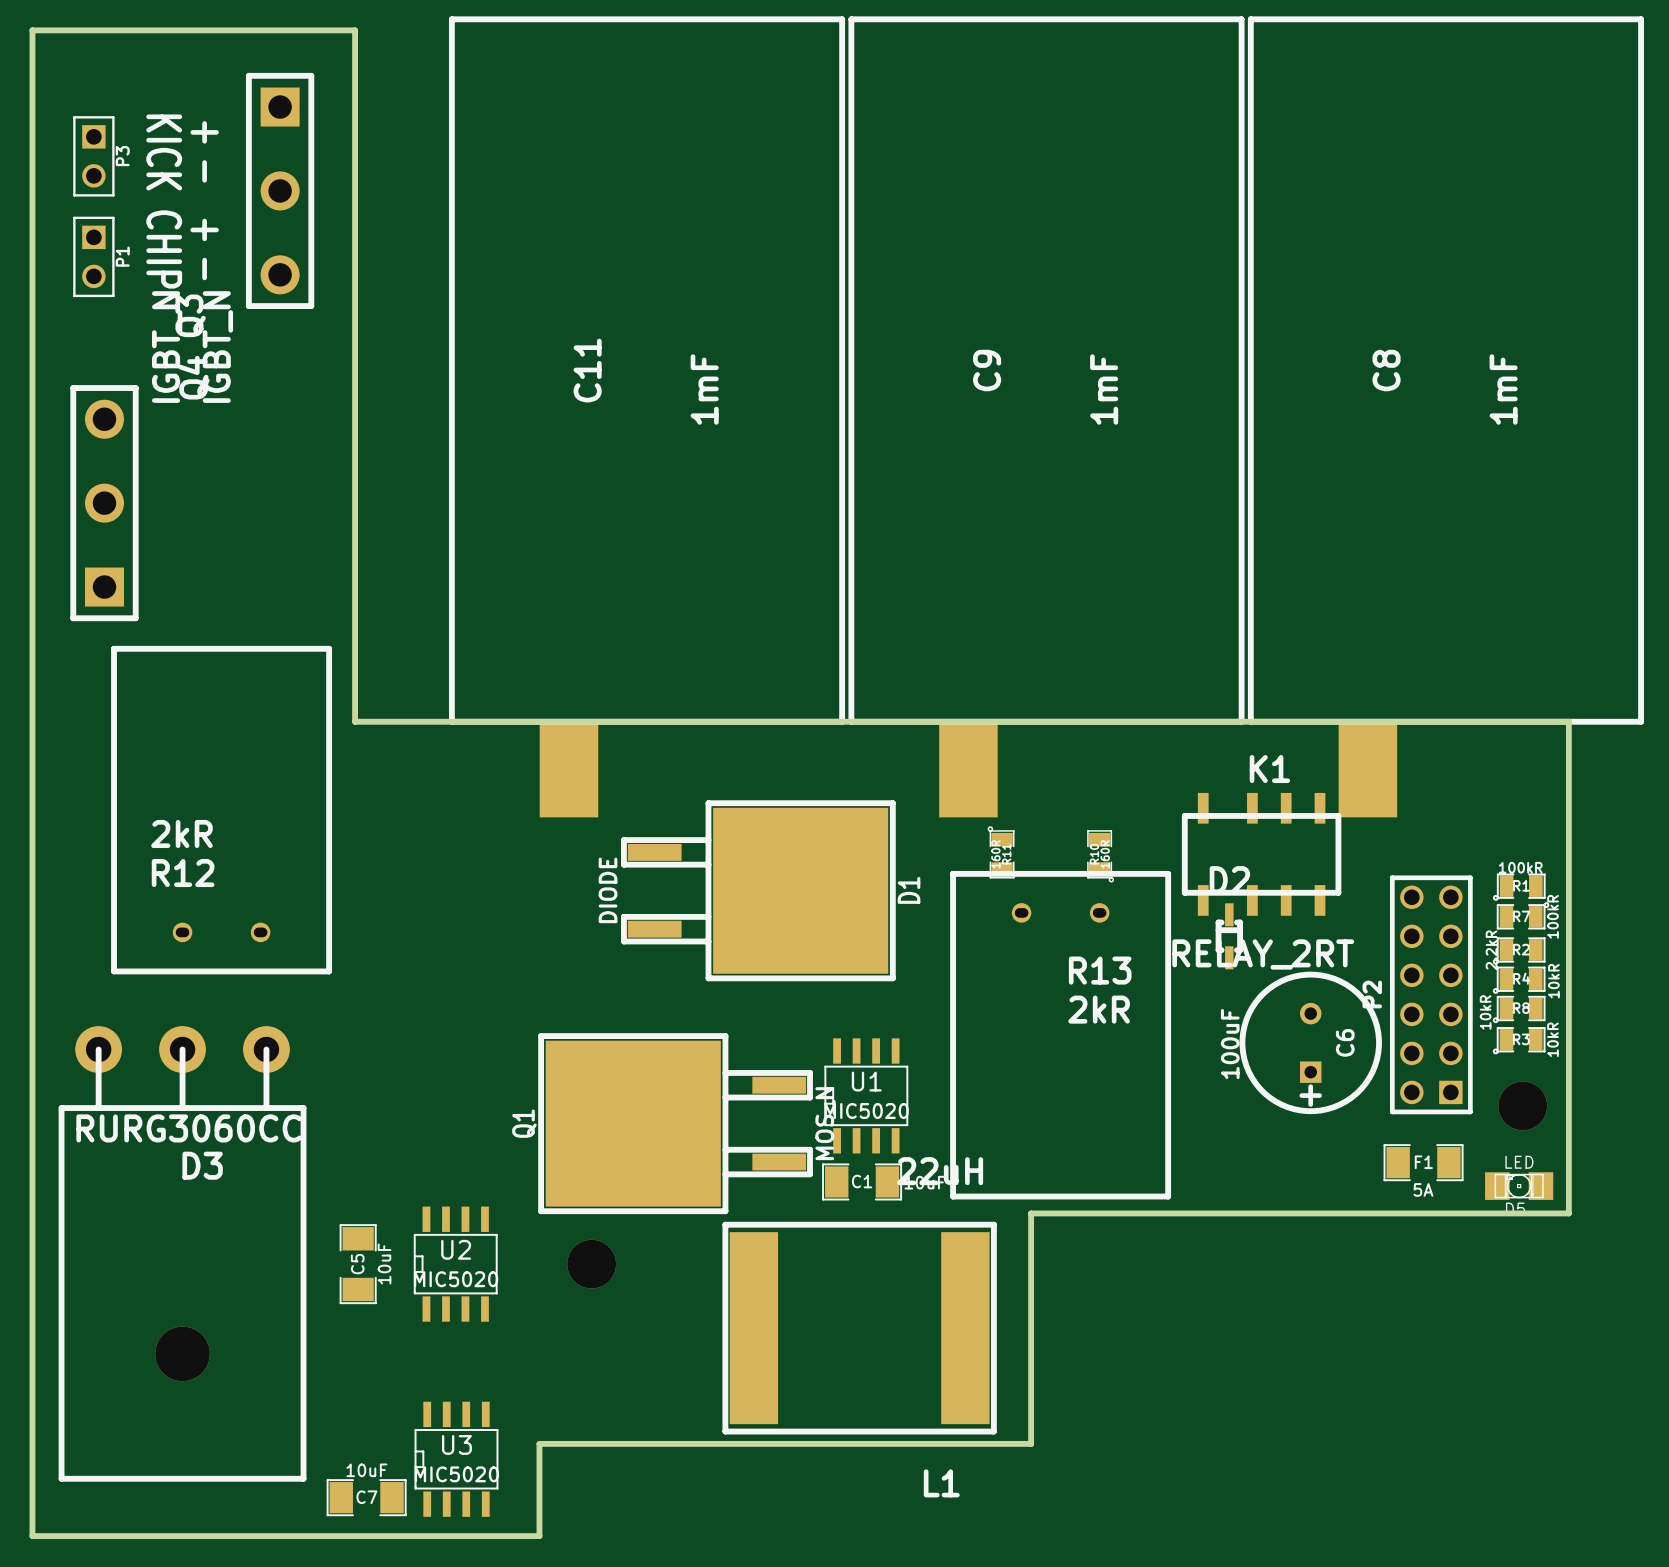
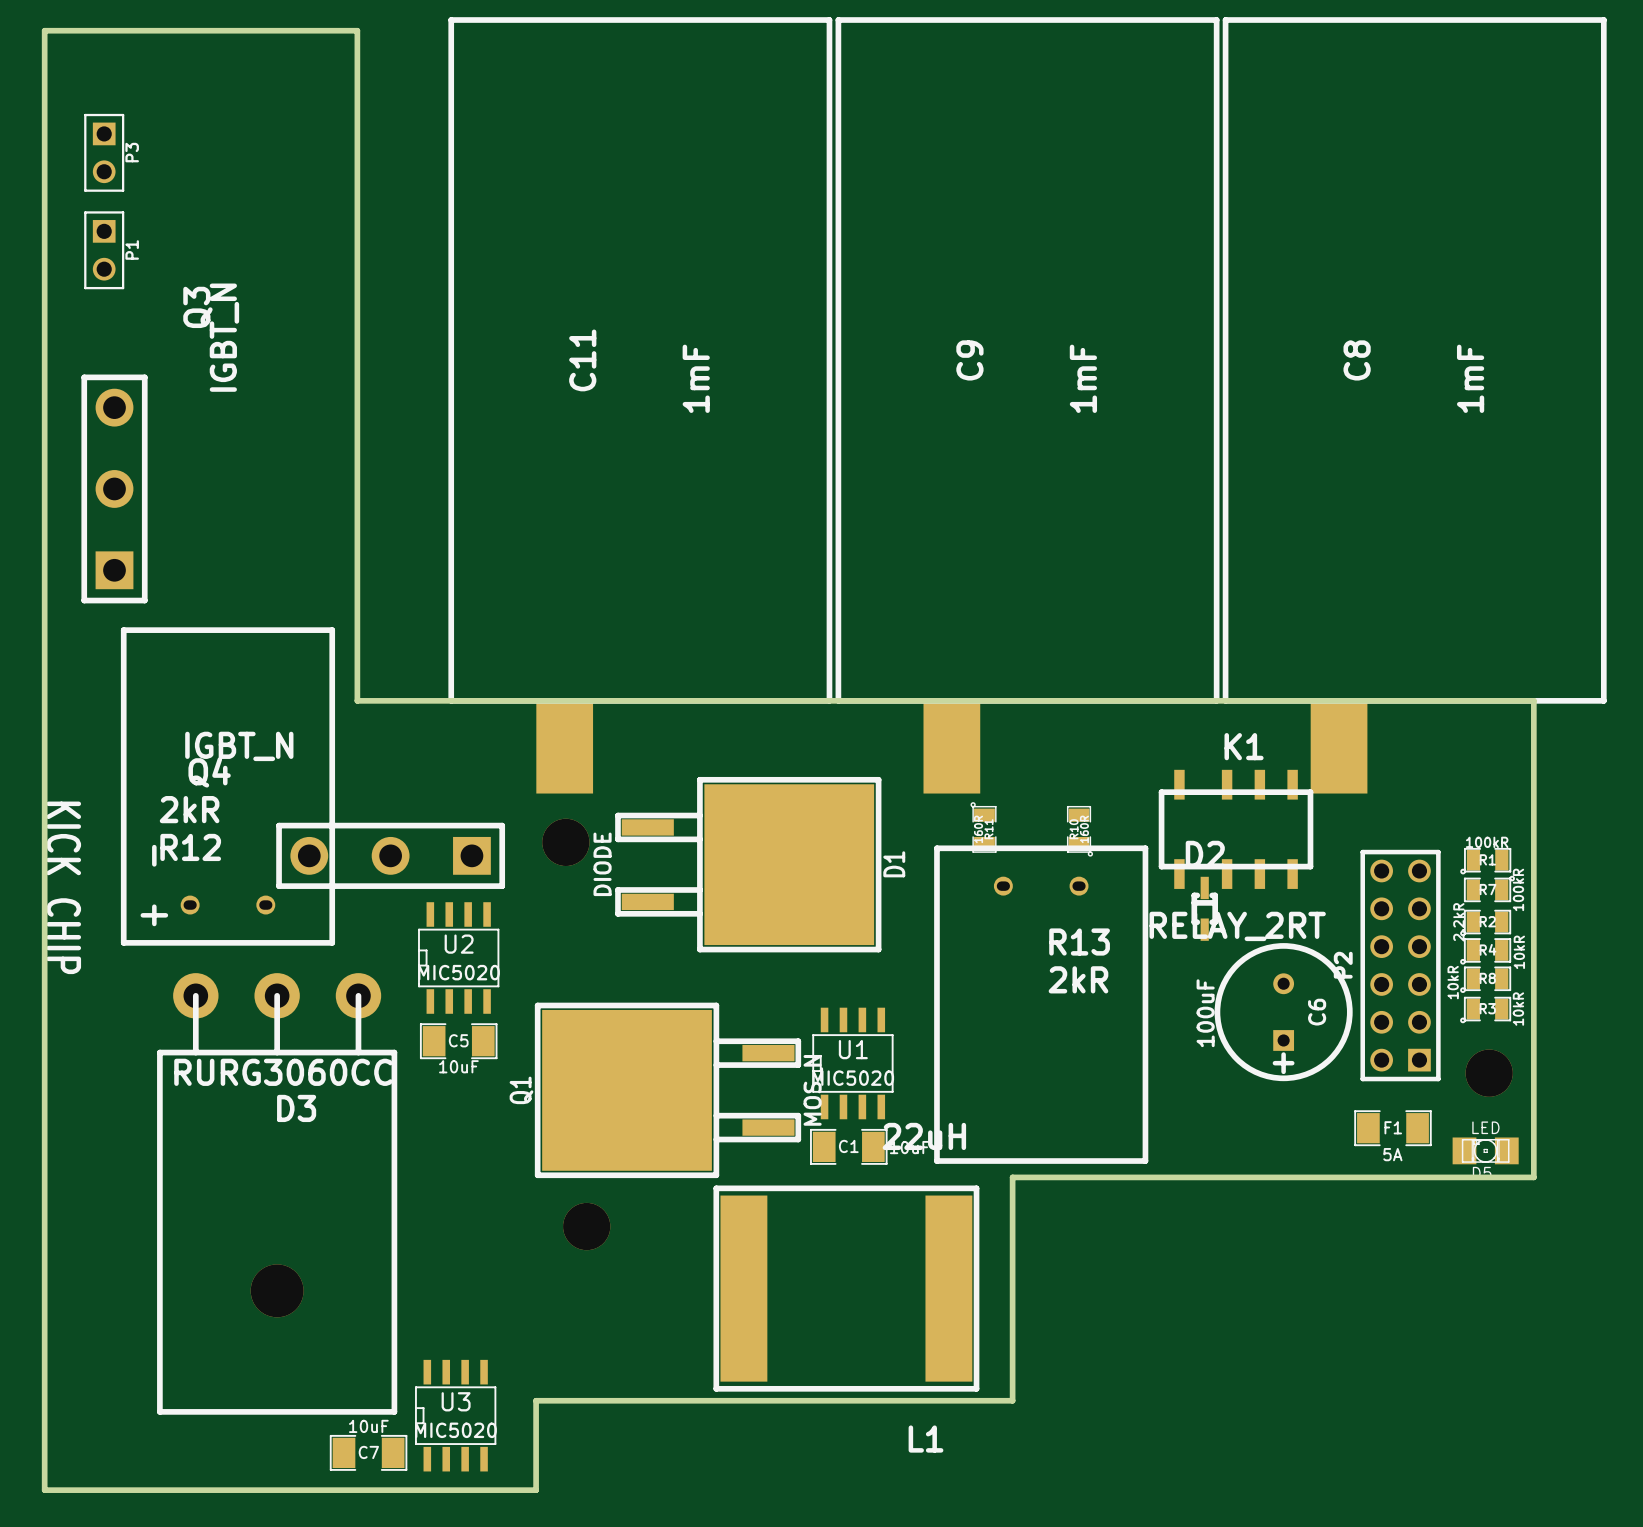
text: + (204, 132) -> none
text: KICK (164, 152) -> none
text: - (204, 171) -> none
Q4 rotation: 0° (280, 190) -> 90° clockwise (390, 855)
Q4 position: (280, 190) -> (390, 855)
text: + (204, 229) -> none
text: CHIP (164, 249) -> none
text: - (204, 268) -> none
text: none -> KICK (63, 838)
part: none -> (565, 842)
text: none -> - (154, 855)
text: none -> + (154, 915)
text: none -> CHIP (63, 936)
D3 position: (182, 1253) -> (277, 1193)
C5 rotation: 0° (358, 1264) -> 90° clockwise (458, 1041)
C5 position: (358, 1264) -> (458, 1041)
U2 position: (455, 1264) -> (458, 957)

